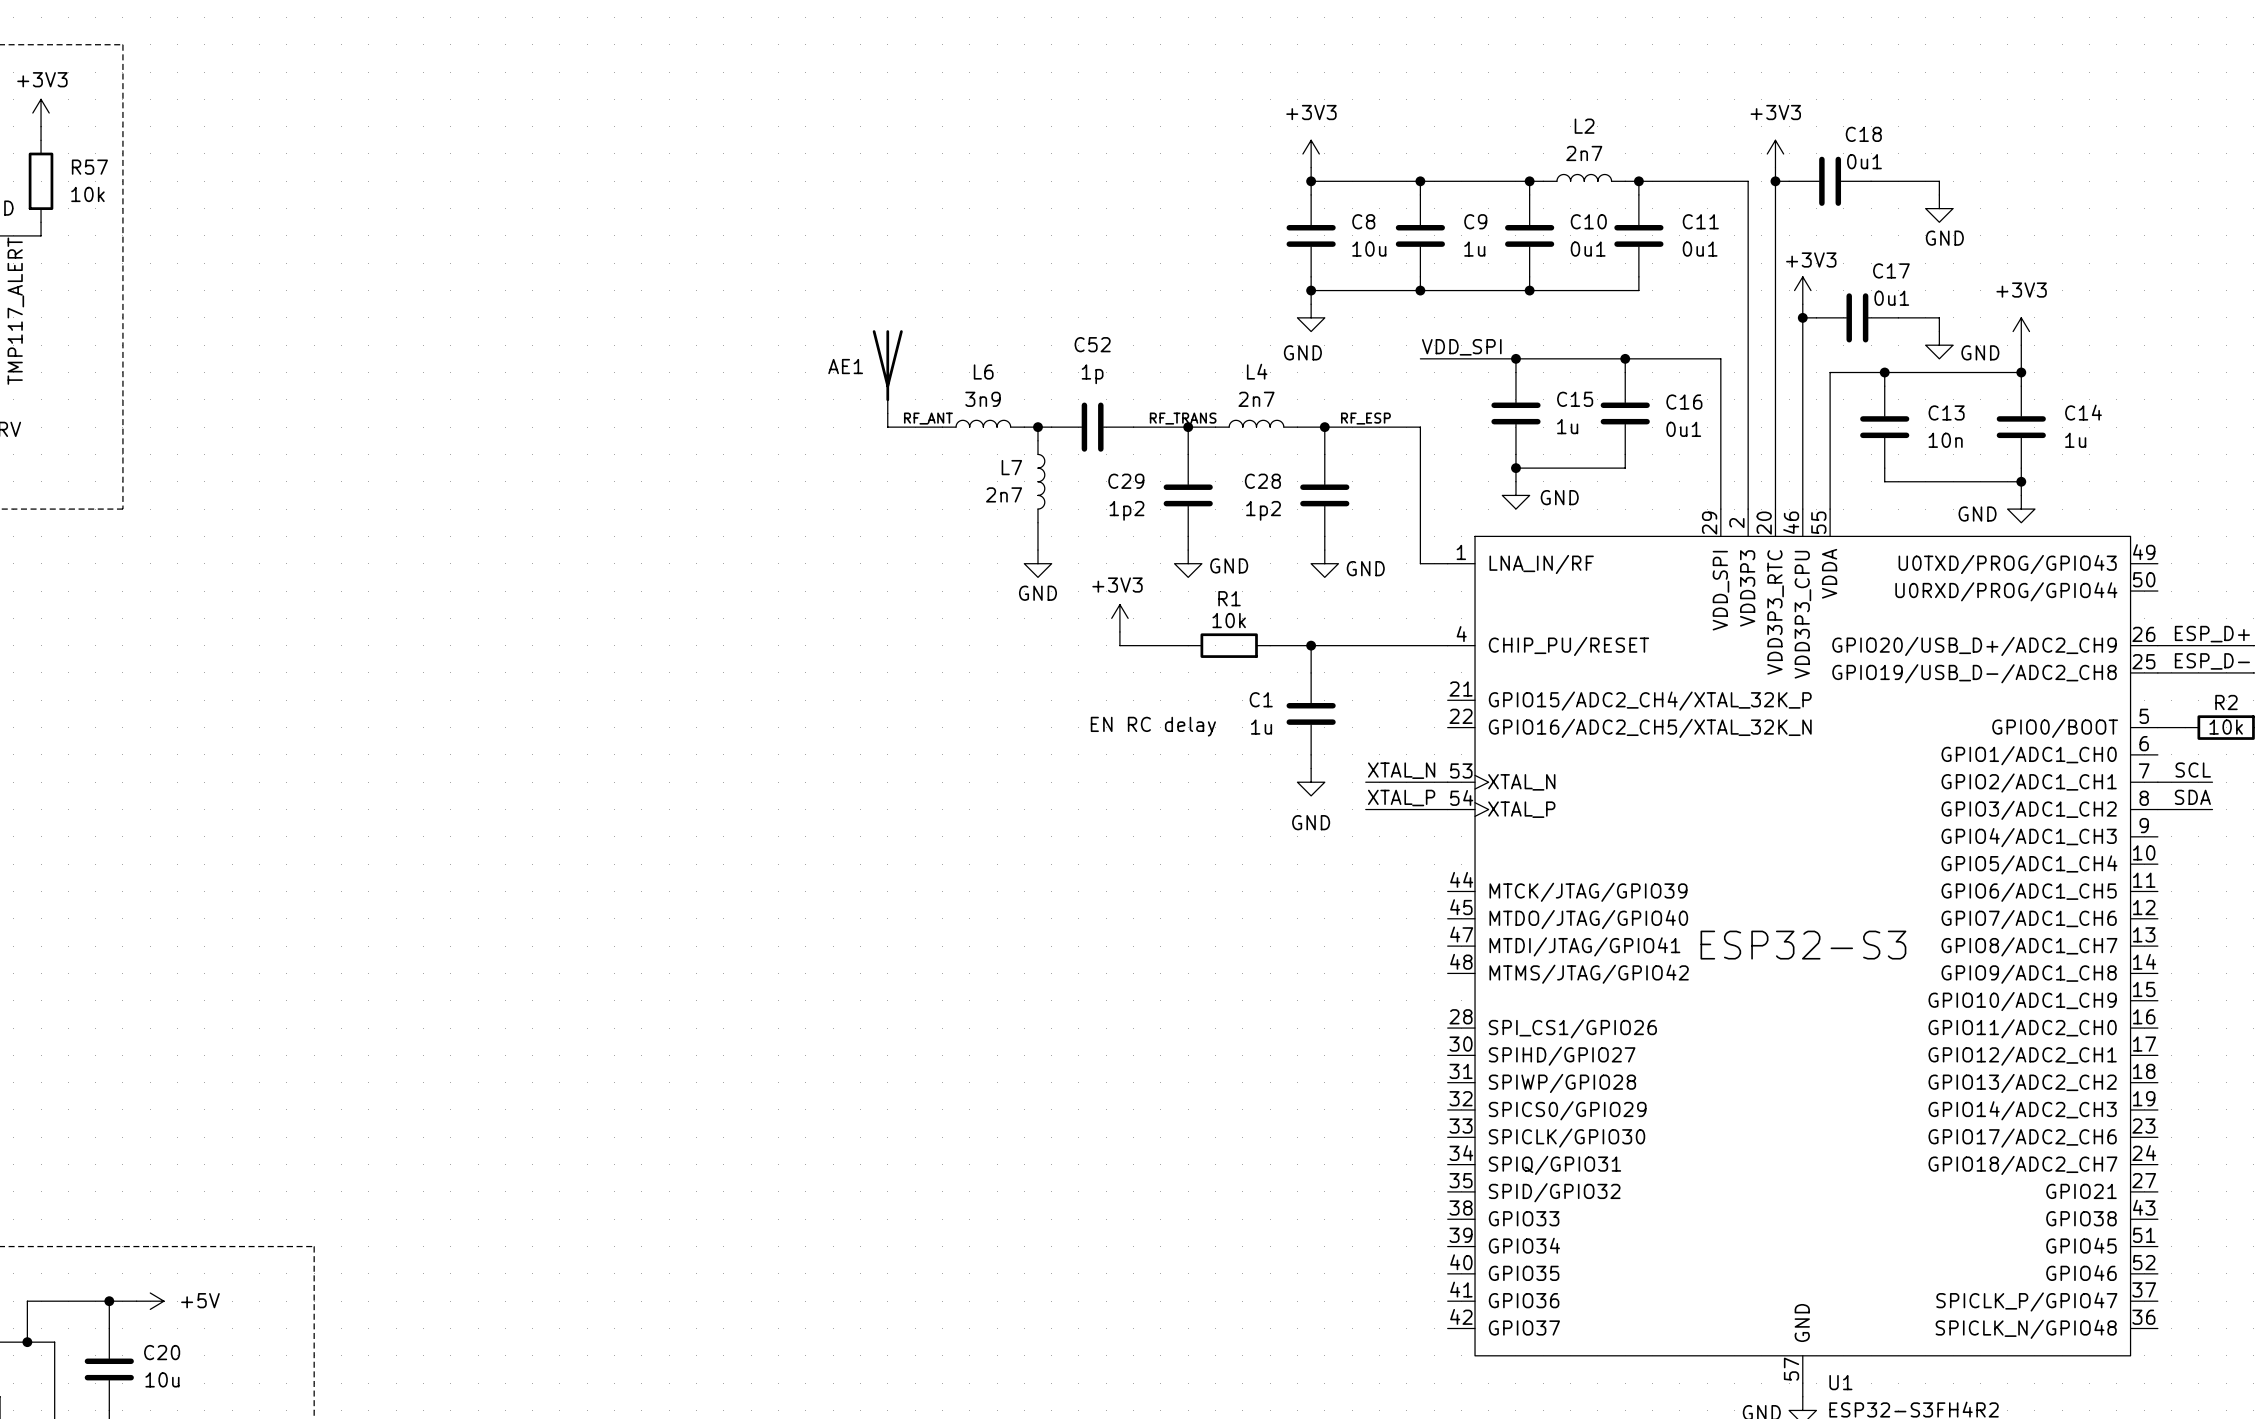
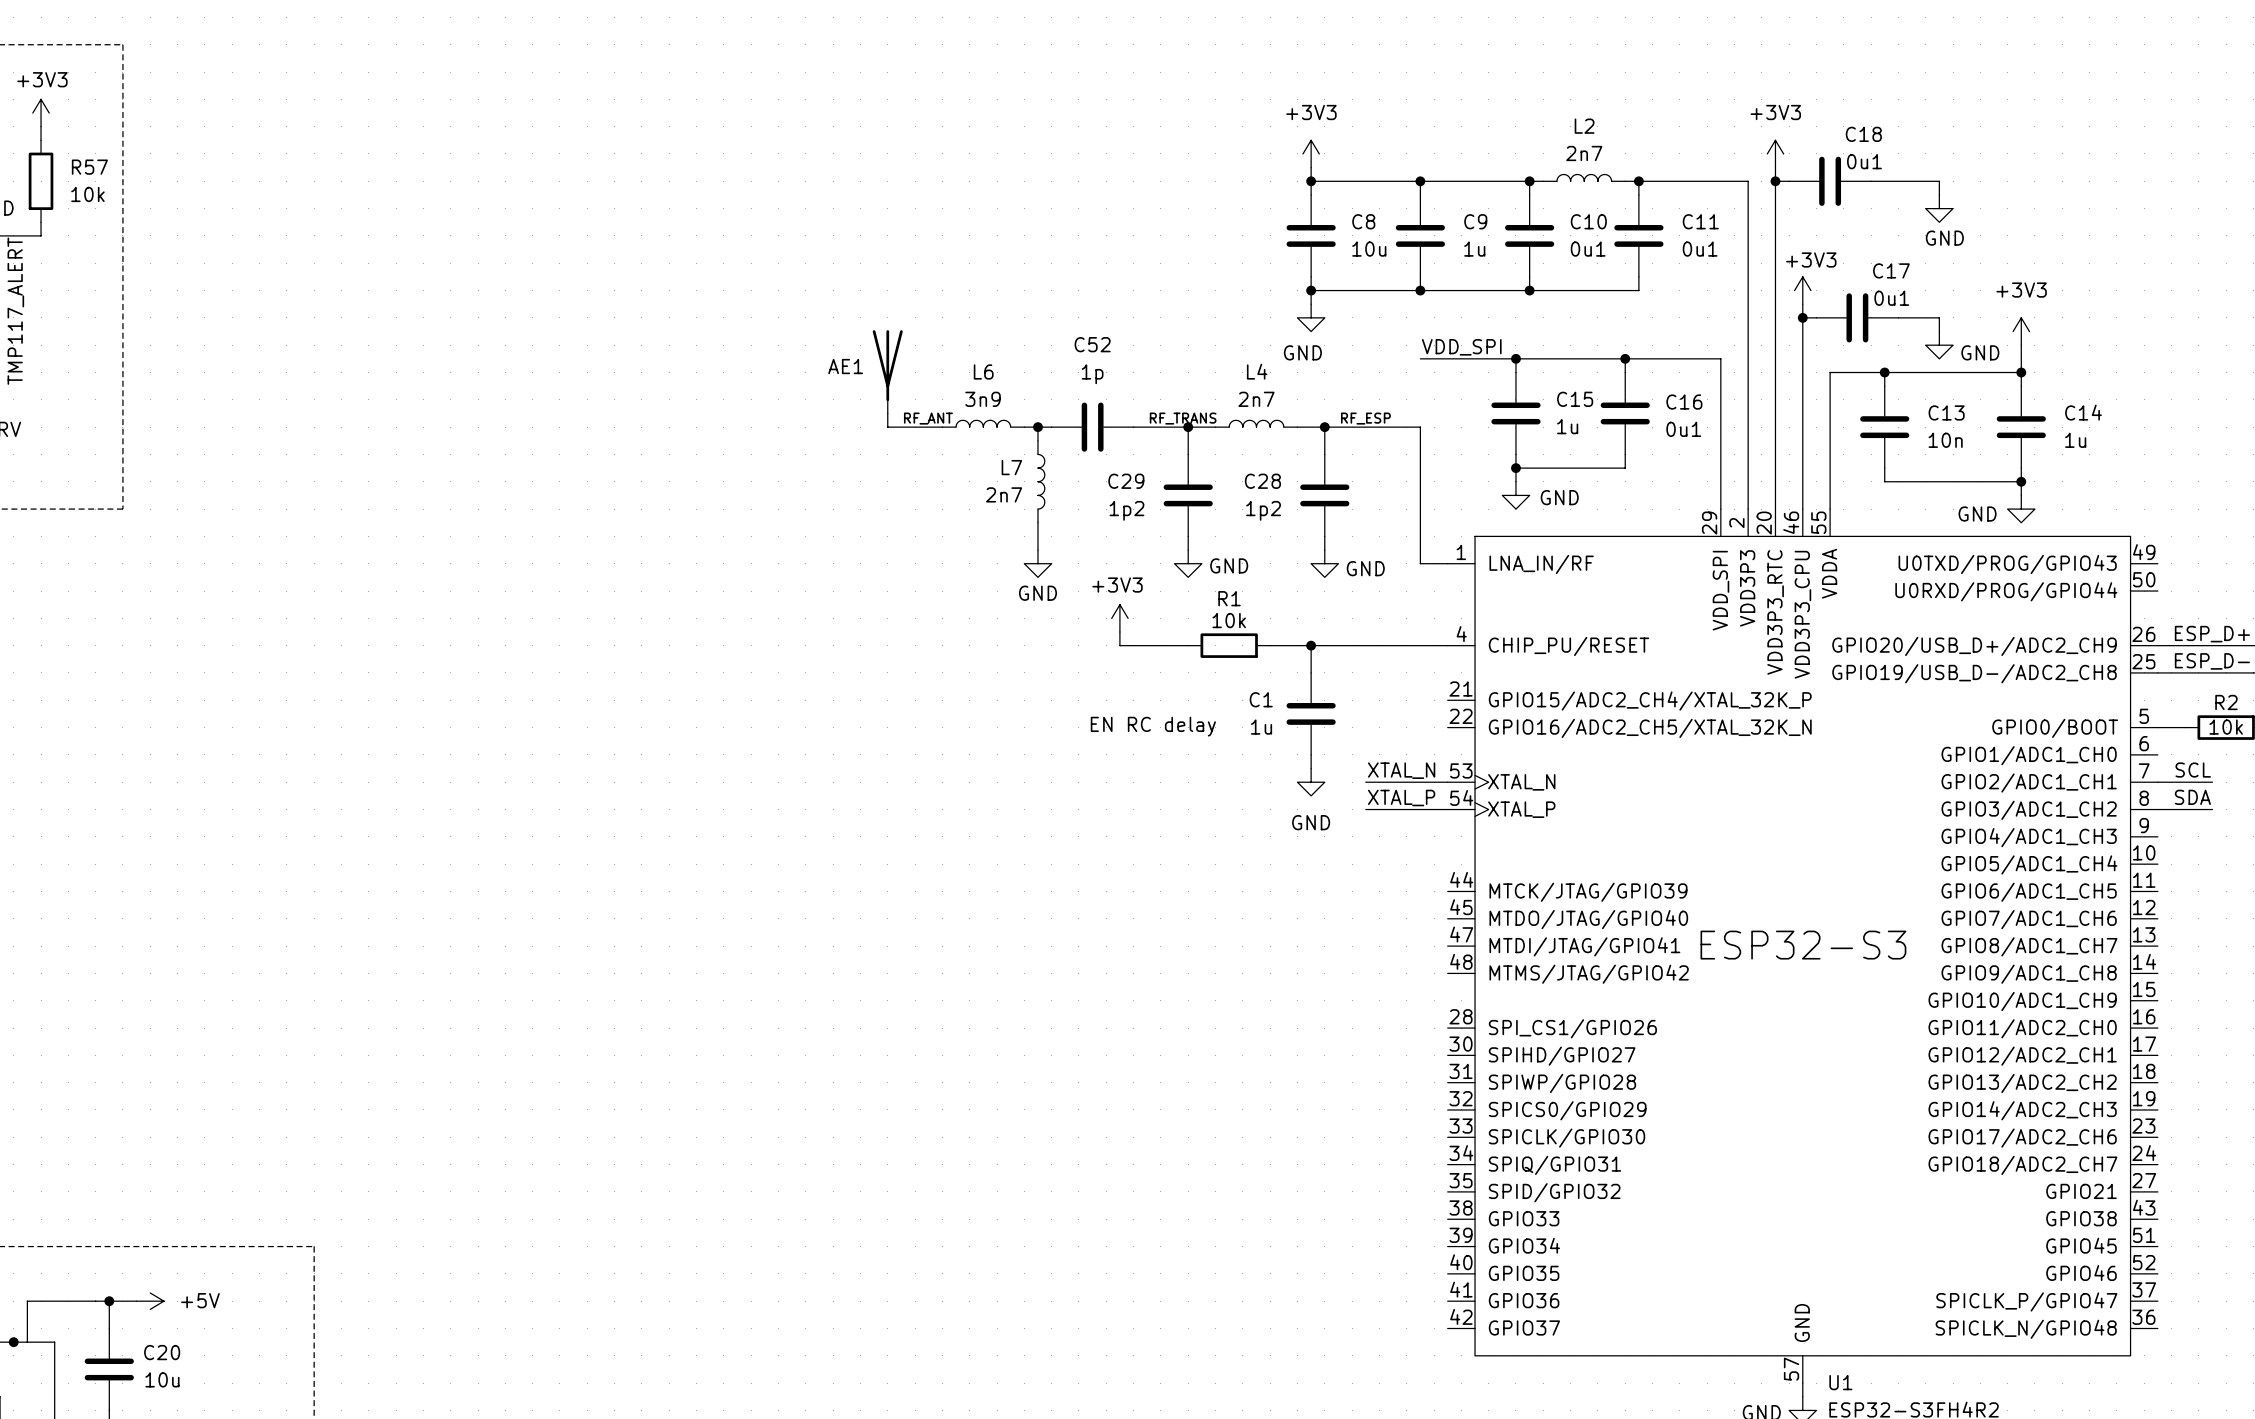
junction position: (27, 1342) -> (13, 1342)

